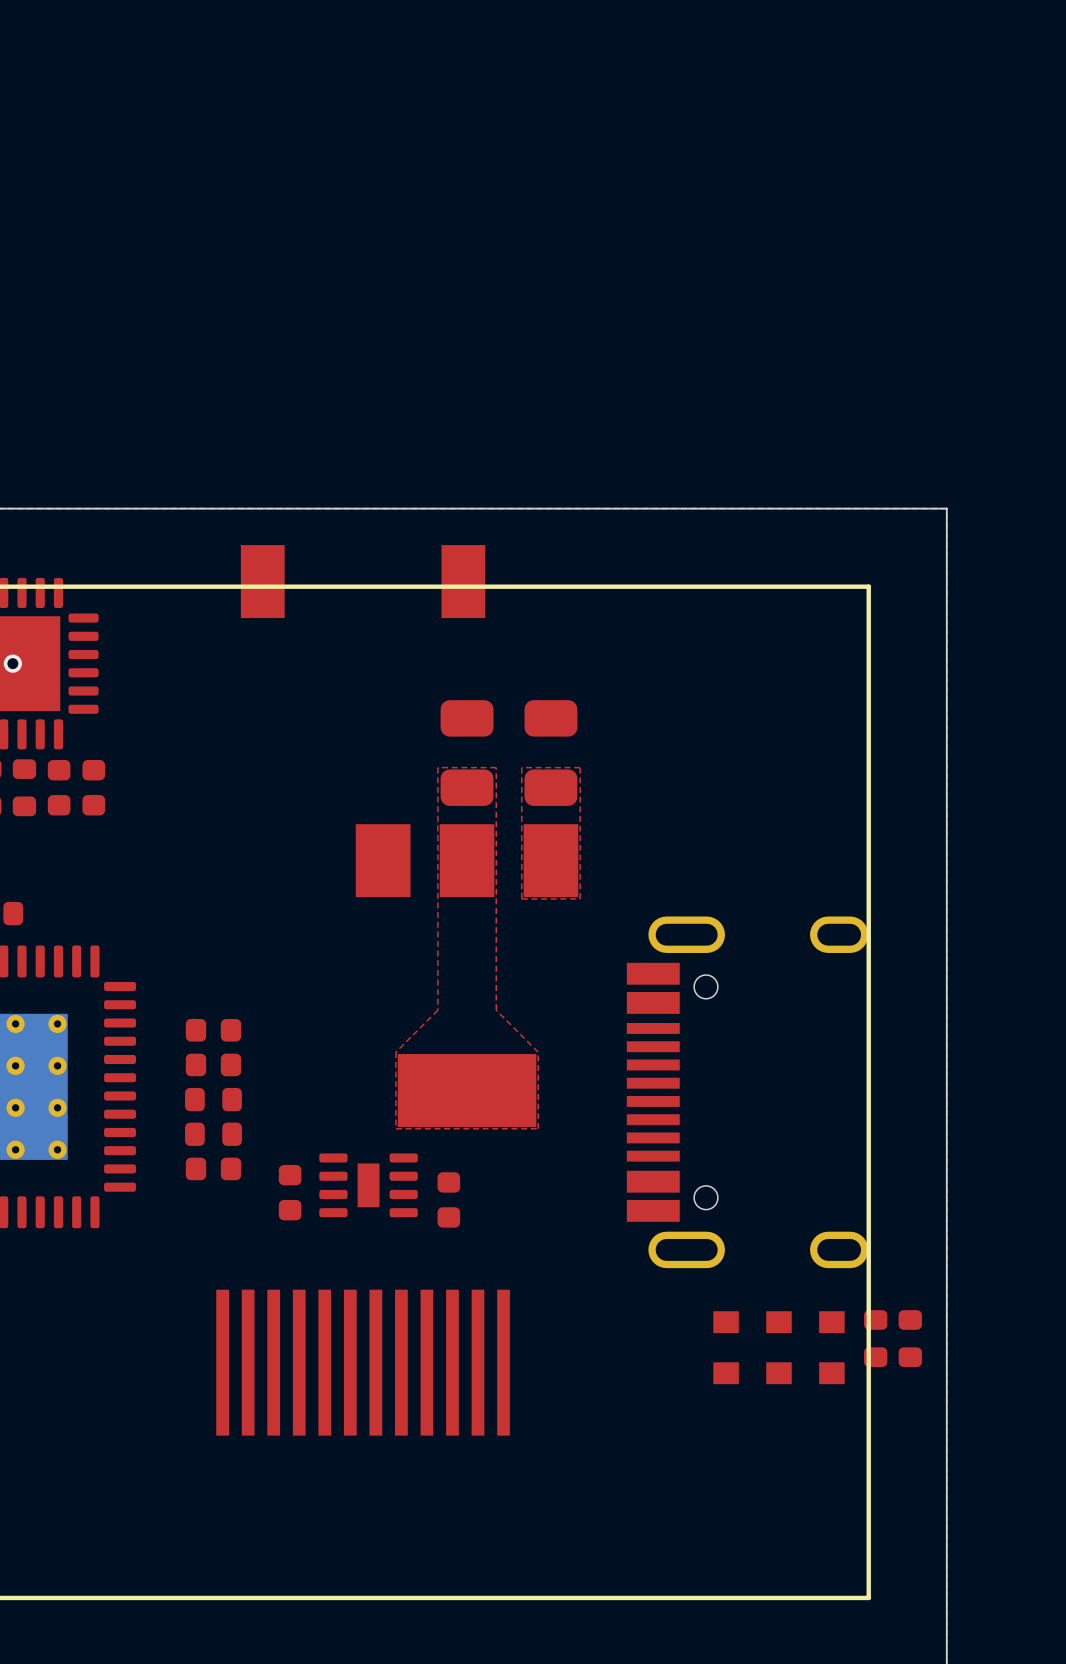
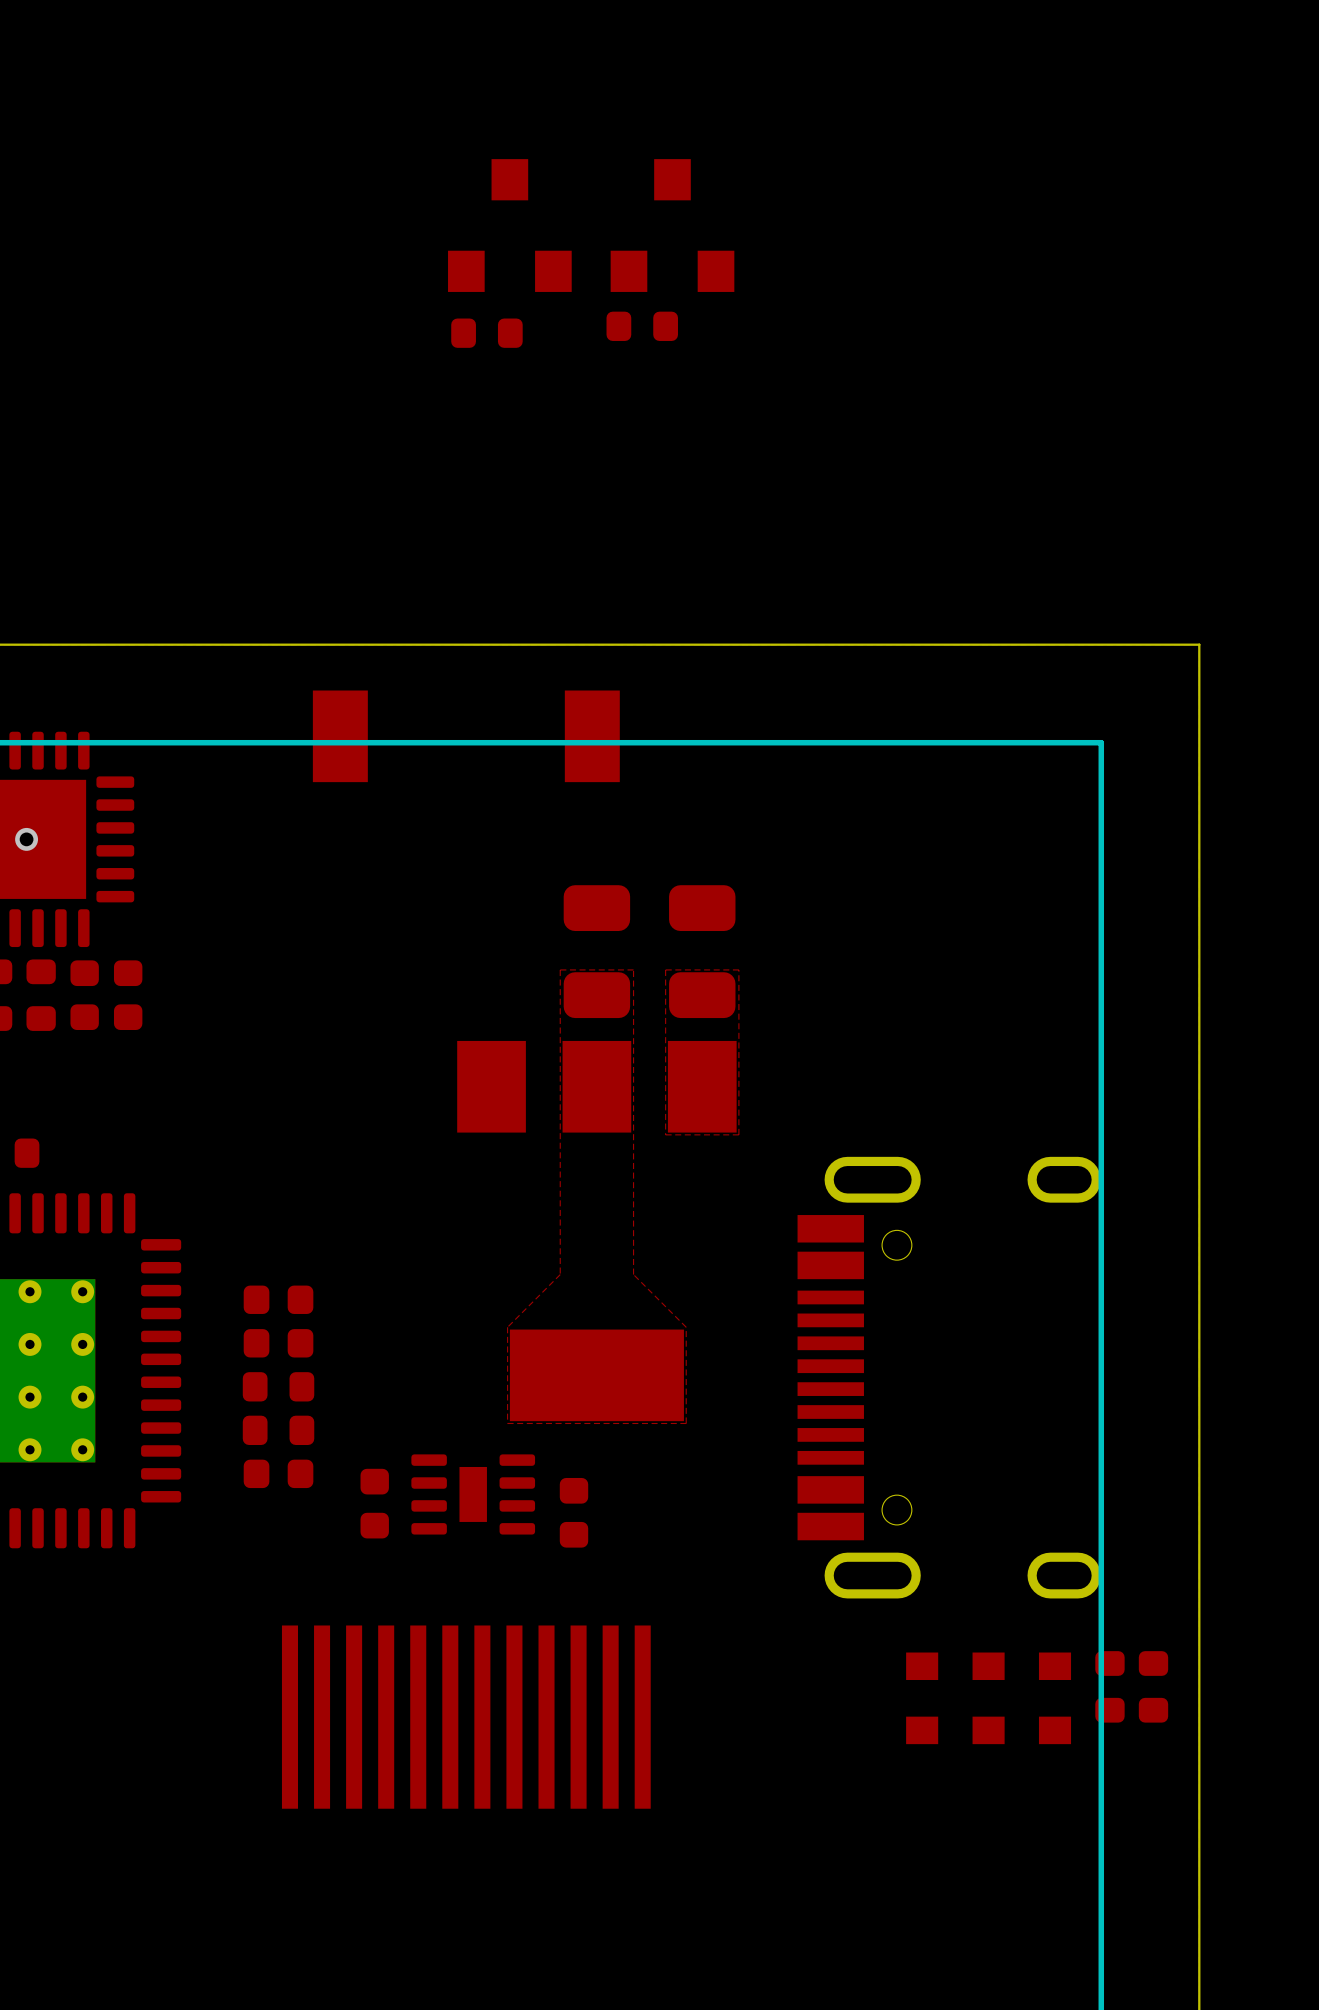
part: none -> (509, 225)
part: none -> (672, 225)
part: none -> (642, 326)
part: none -> (486, 333)

